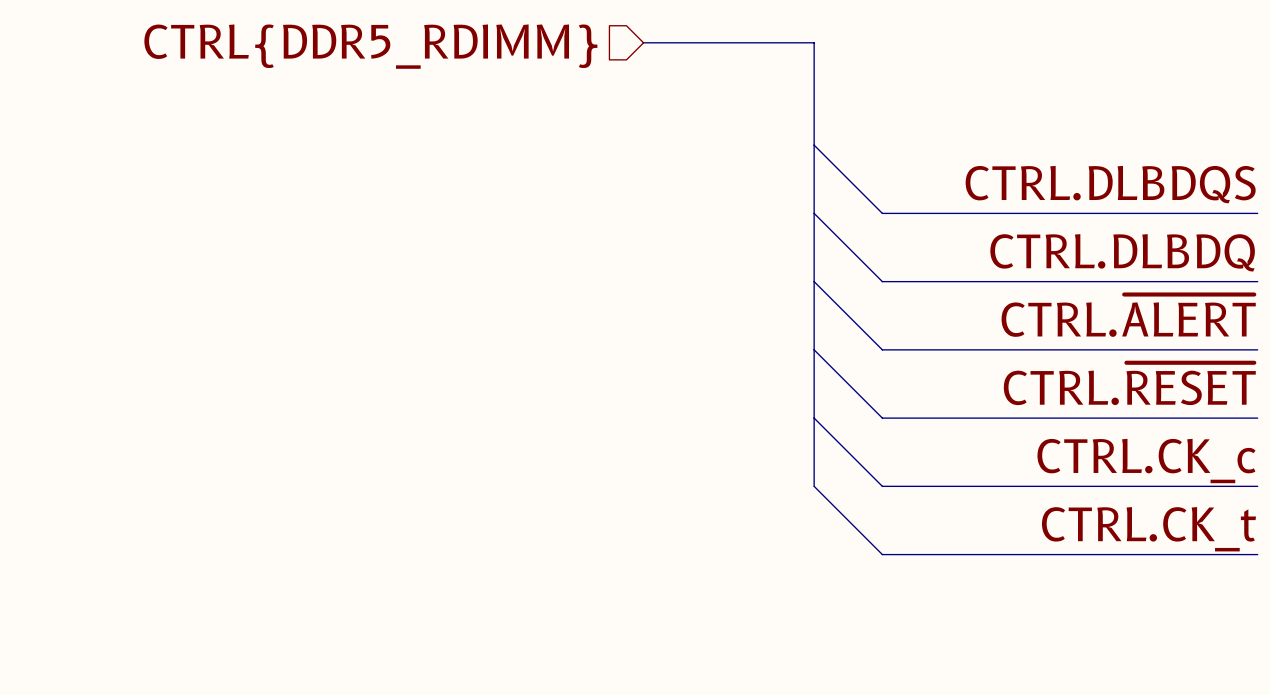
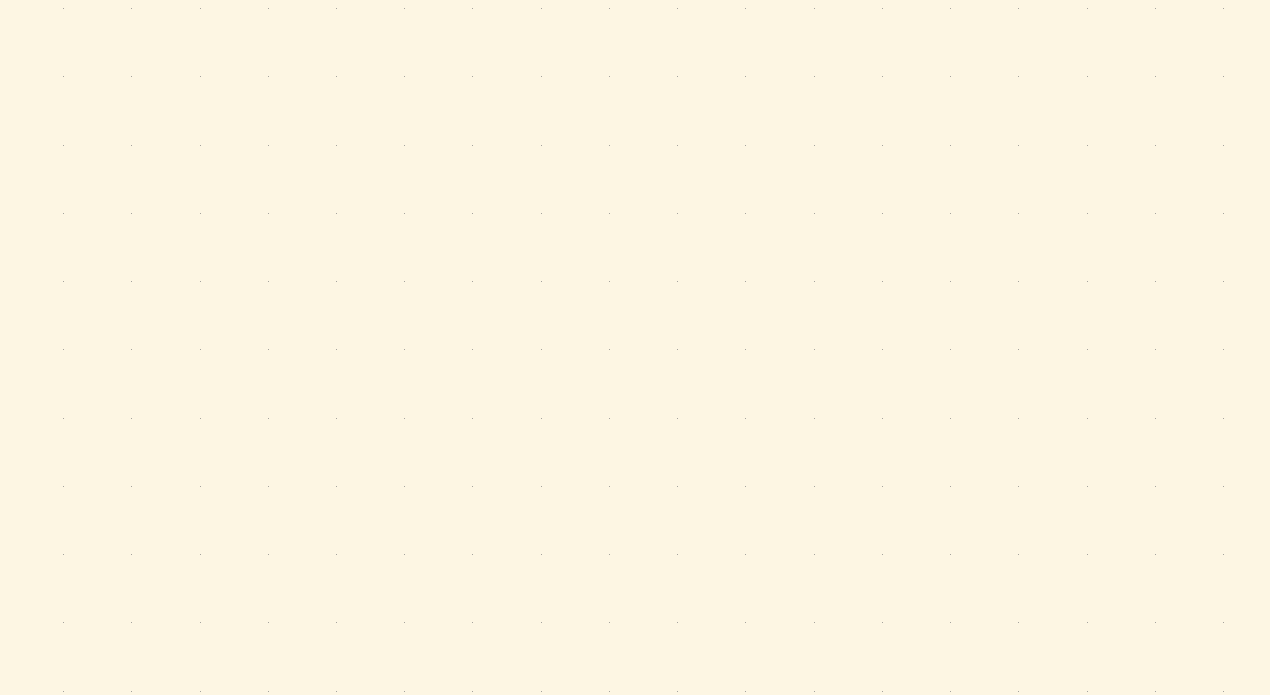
bus: (643, 42) (814, 42) (814, 486) -> none
hierarchical label: CTRL{DDR5_RDIMM} (370, 46) -> none
wire: (814, 145) (882, 213) (1257, 213) -> none
label: CTRL.DLBDQS (1110, 184) -> none
wire: (814, 213) (882, 281) (1257, 281) -> none
label: CTRL.DLBDQ (1122, 252) -> none
wire: (814, 281) (882, 349) (1257, 349) -> none
label: CTRL.~{ALERT} (1128, 315) -> none
wire: (814, 349) (882, 418) (1257, 418) -> none
label: CTRL.~{RESET} (1129, 383) -> none
wire: (814, 418) (882, 486) (1257, 486) -> none
label: CTRL.CK_c (1146, 461) -> none
wire: (814, 486) (882, 554) (1257, 554) -> none
label: CTRL.CK_t (1148, 529) -> none

